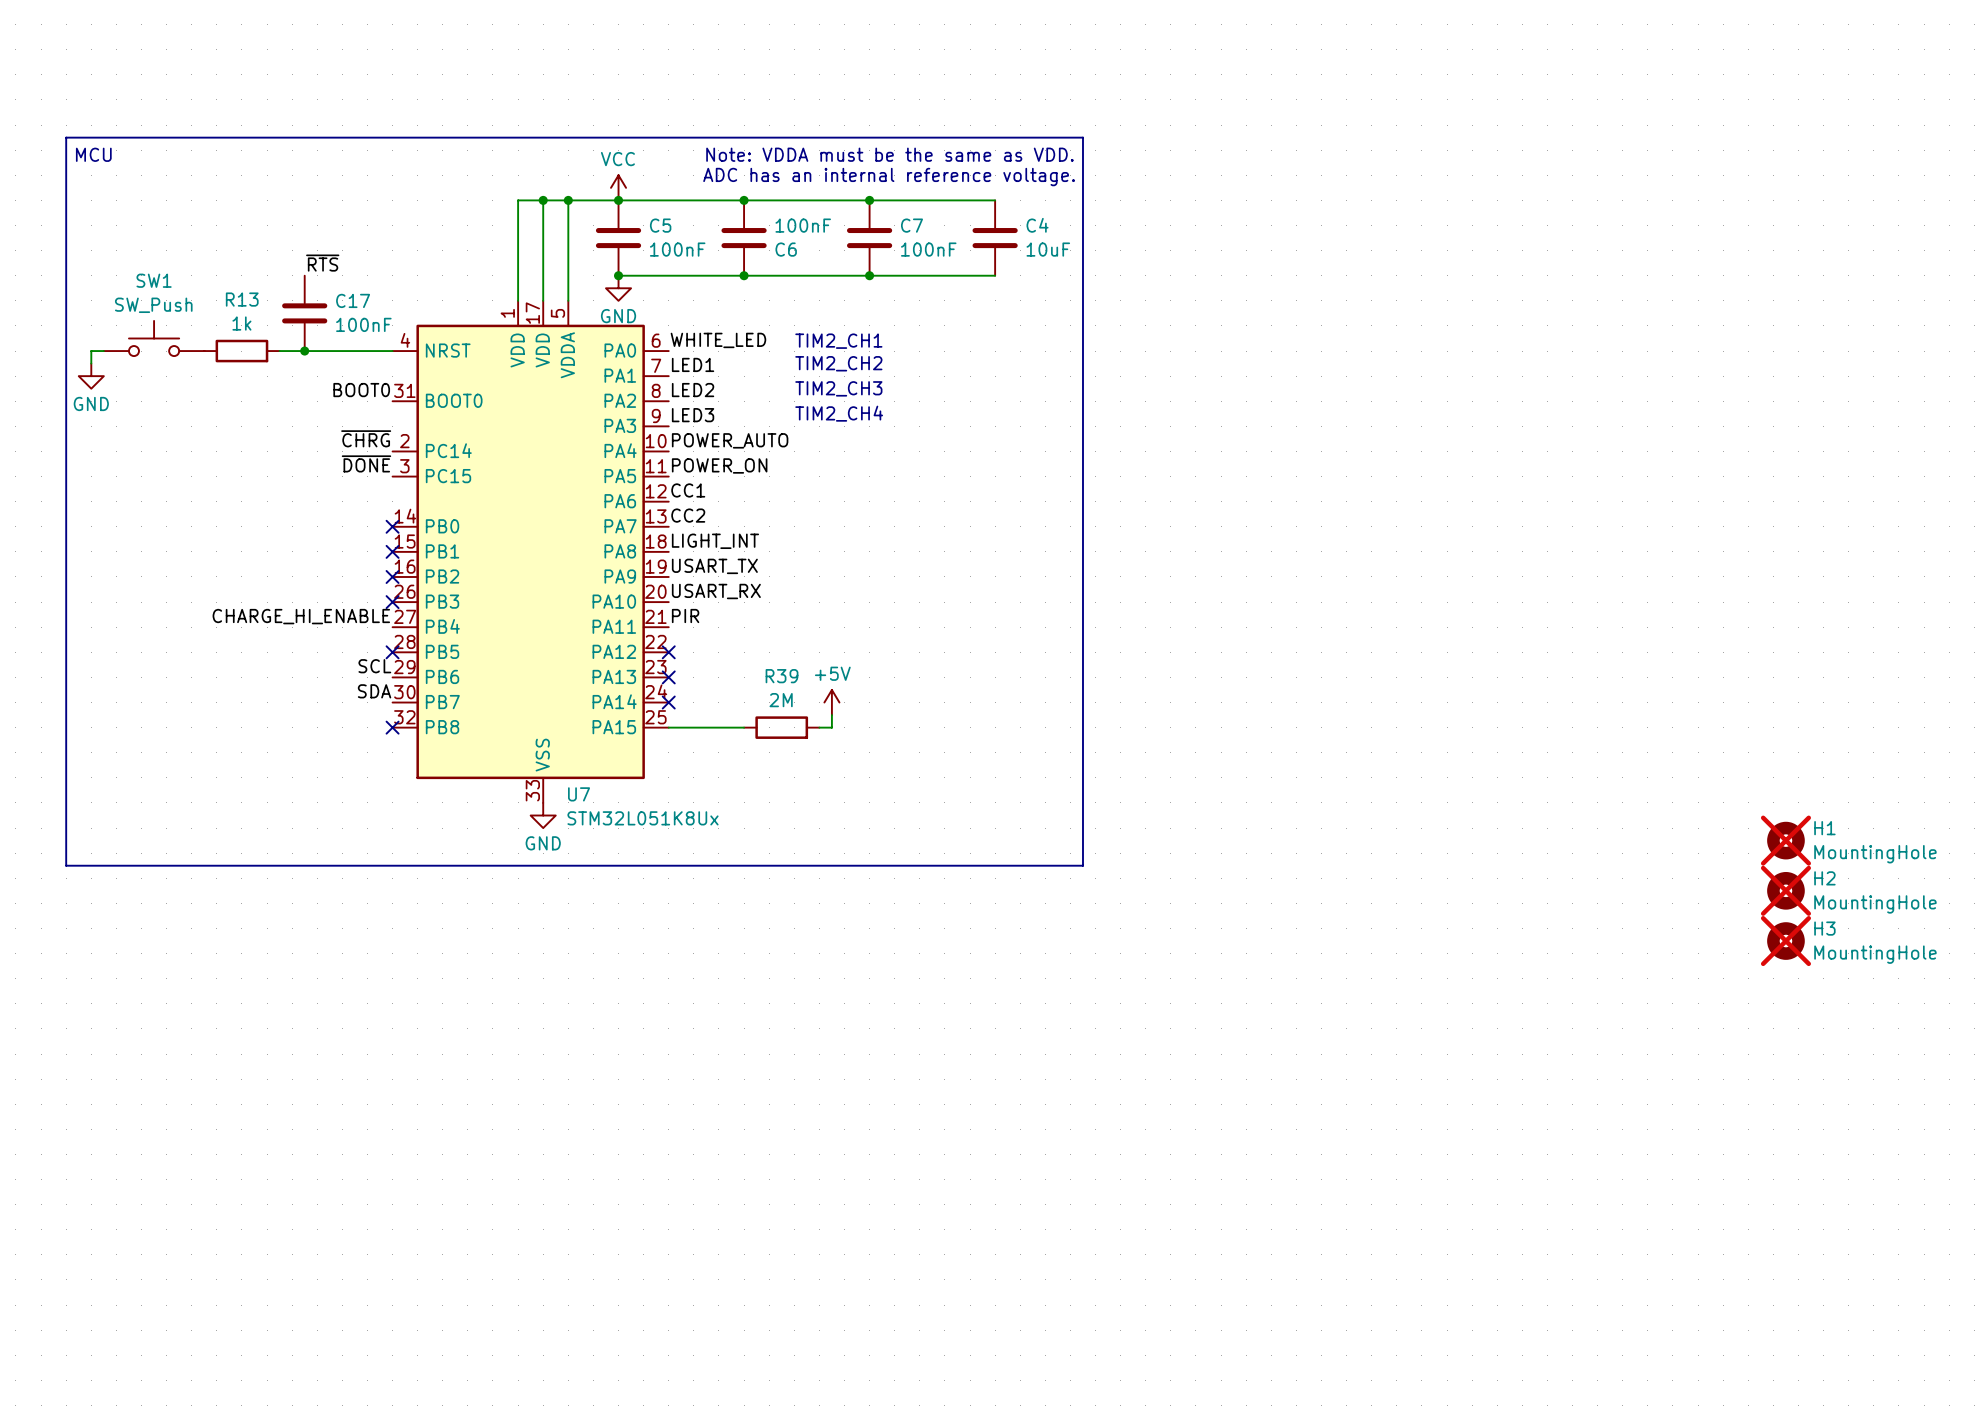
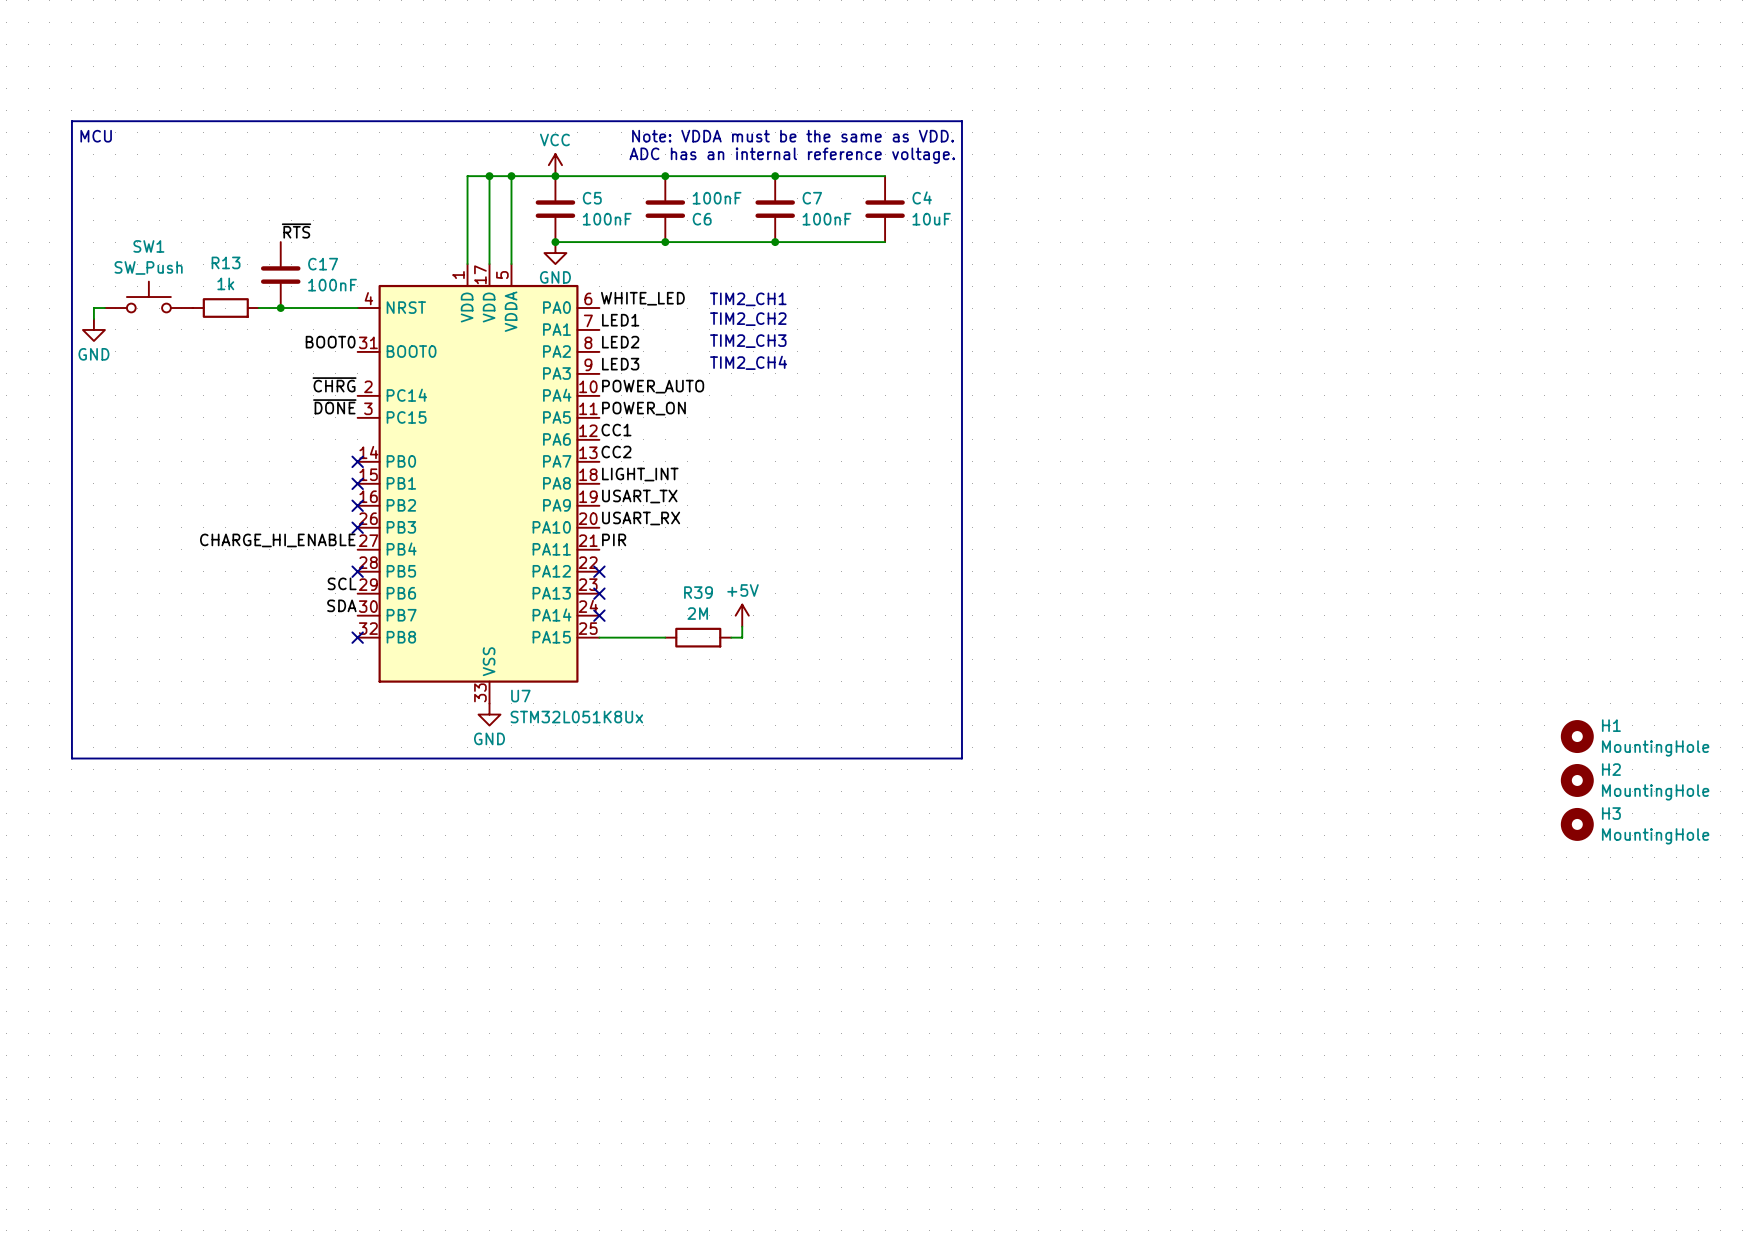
H1 do-not-place cross: (1785, 840) -> none
H2 do-not-place cross: (1785, 890) -> none
H3 do-not-place cross: (1785, 941) -> none

